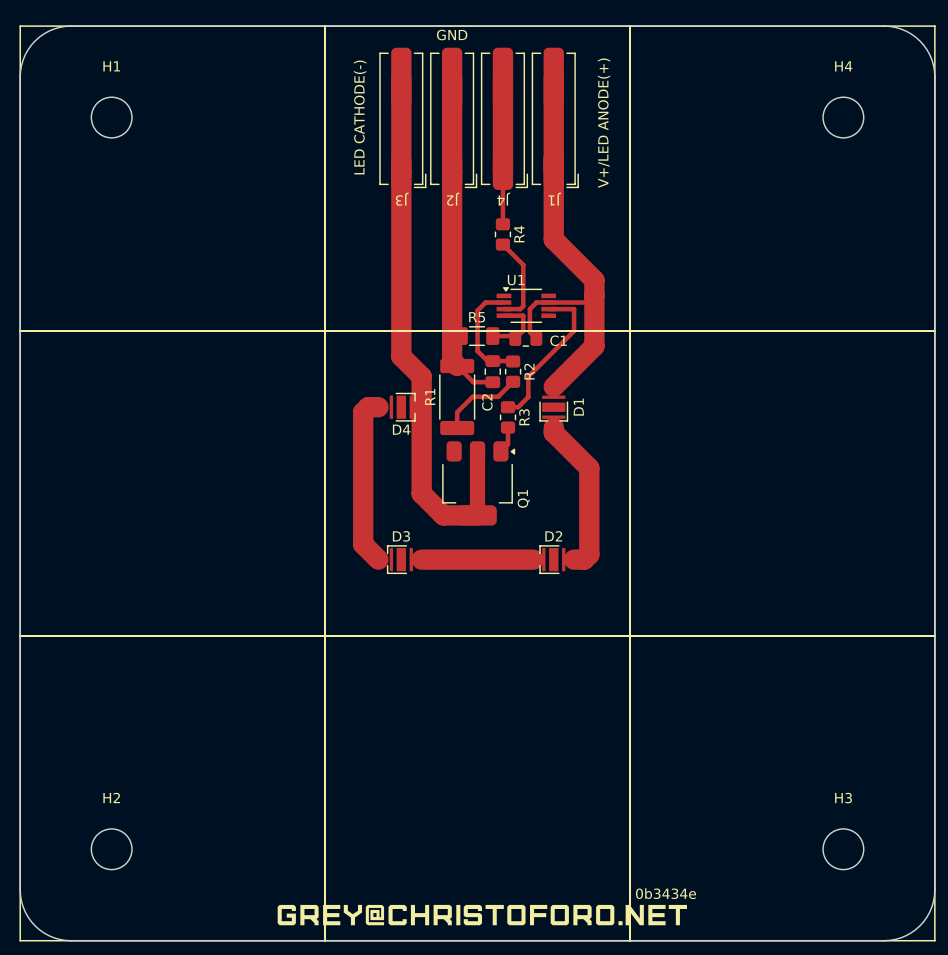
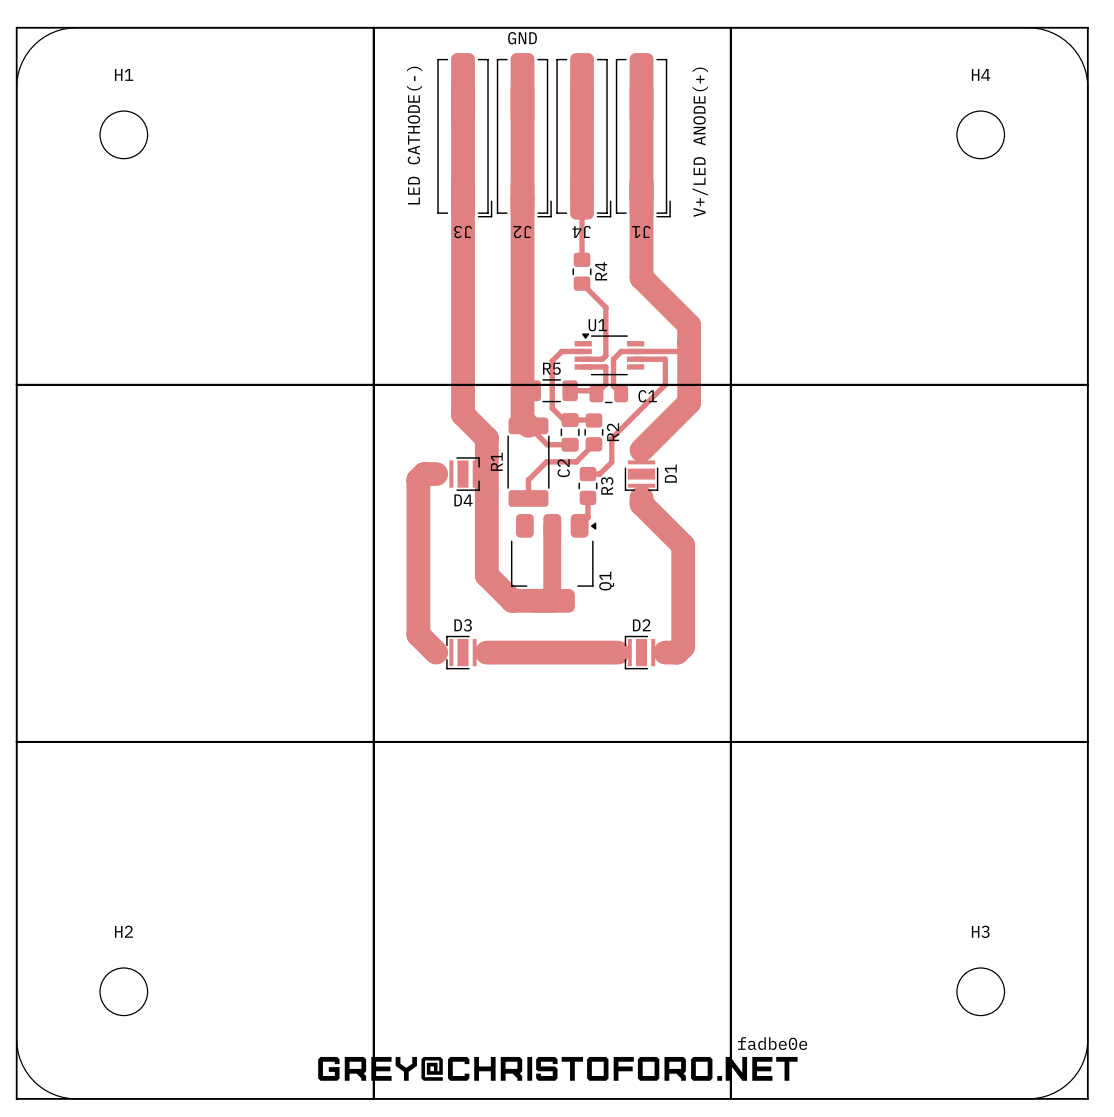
text: 0b3434e (666, 893) -> fadbe0e (772, 1043)

